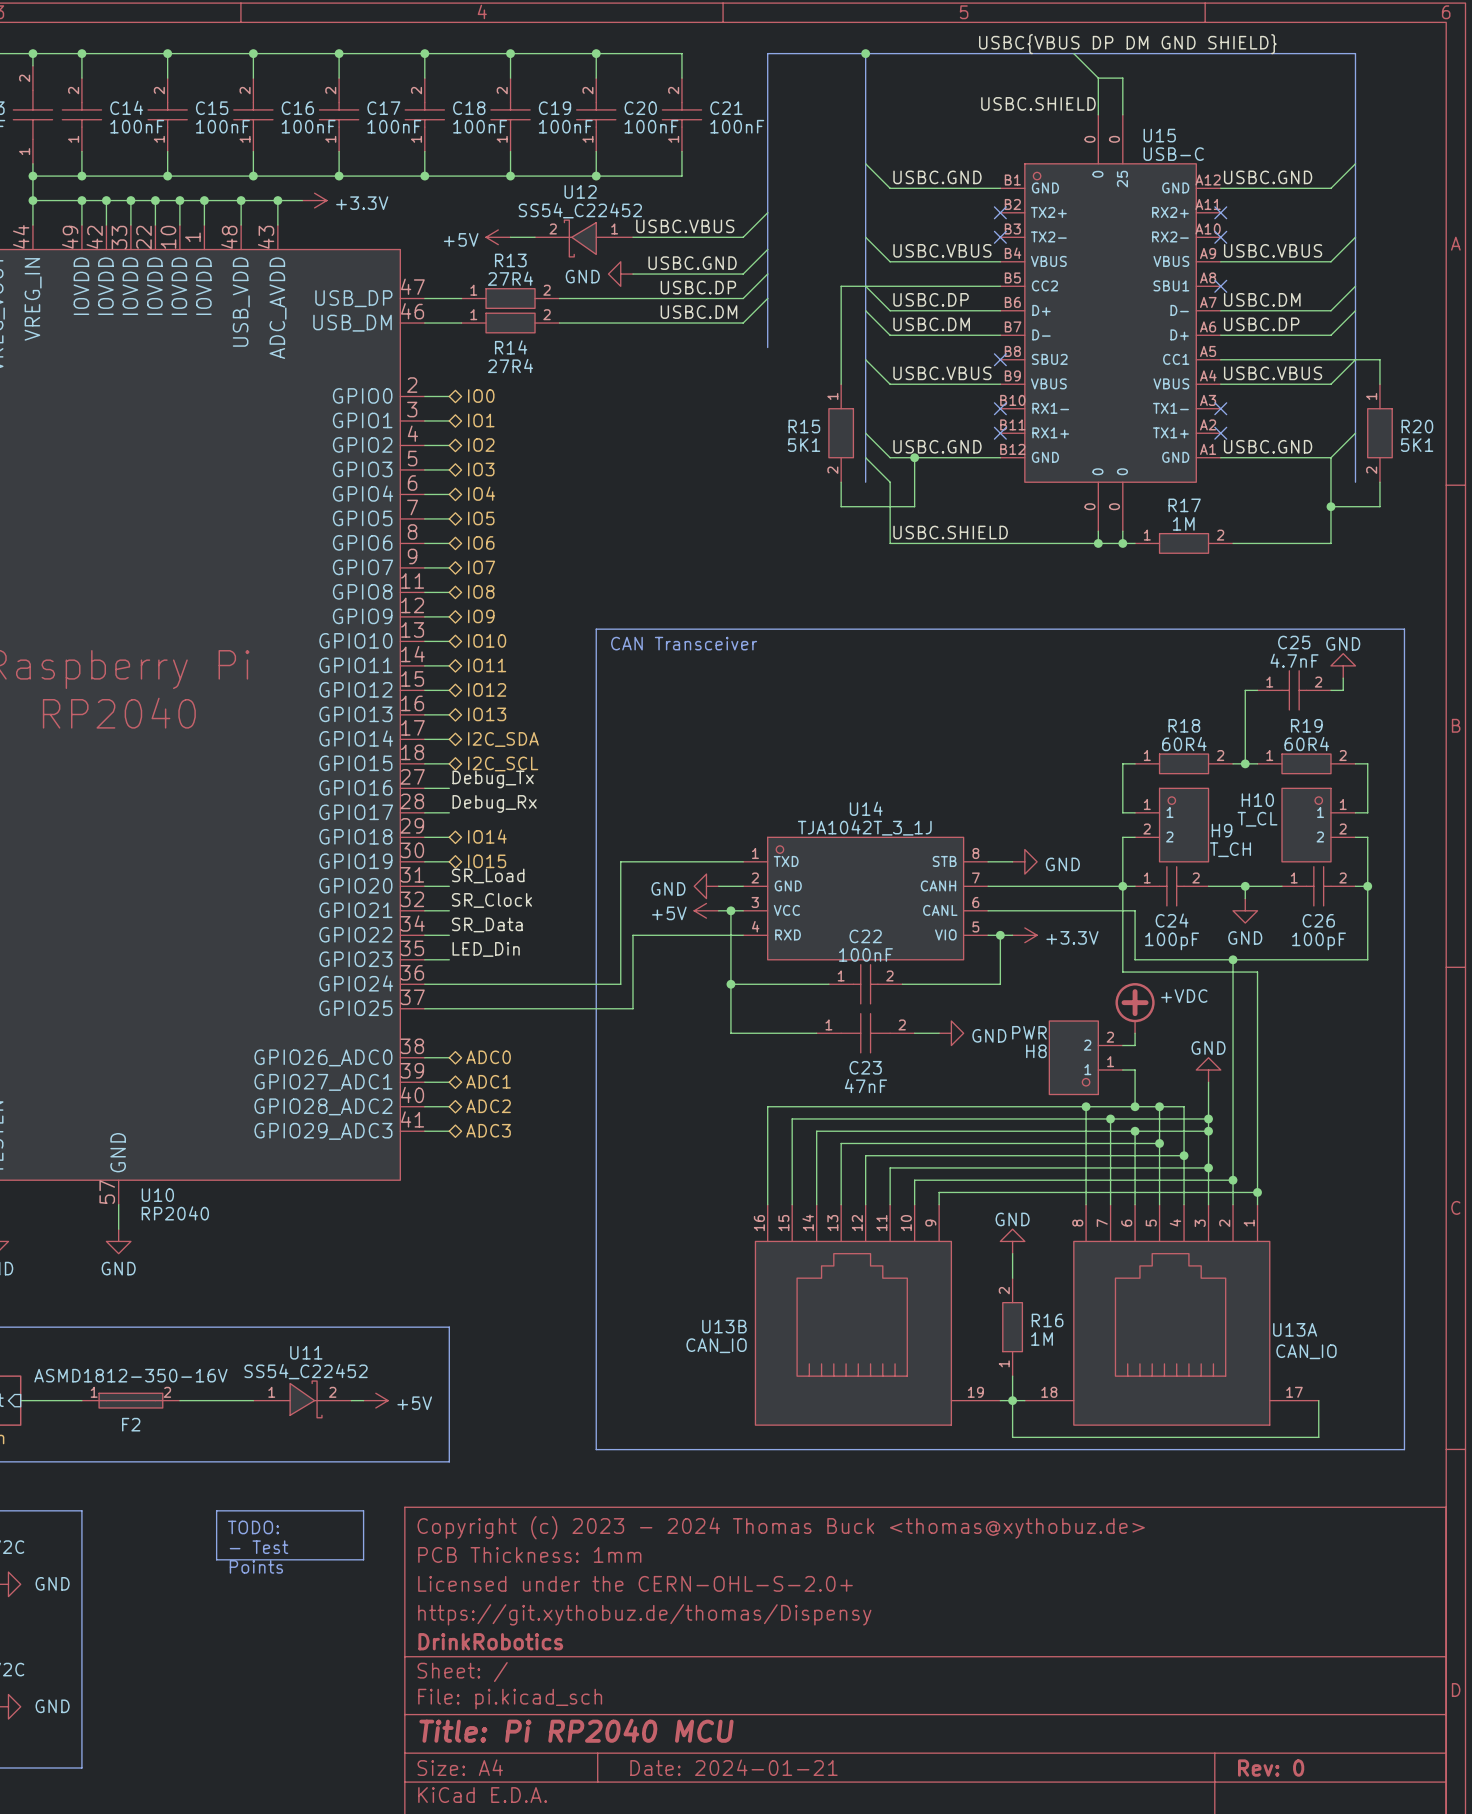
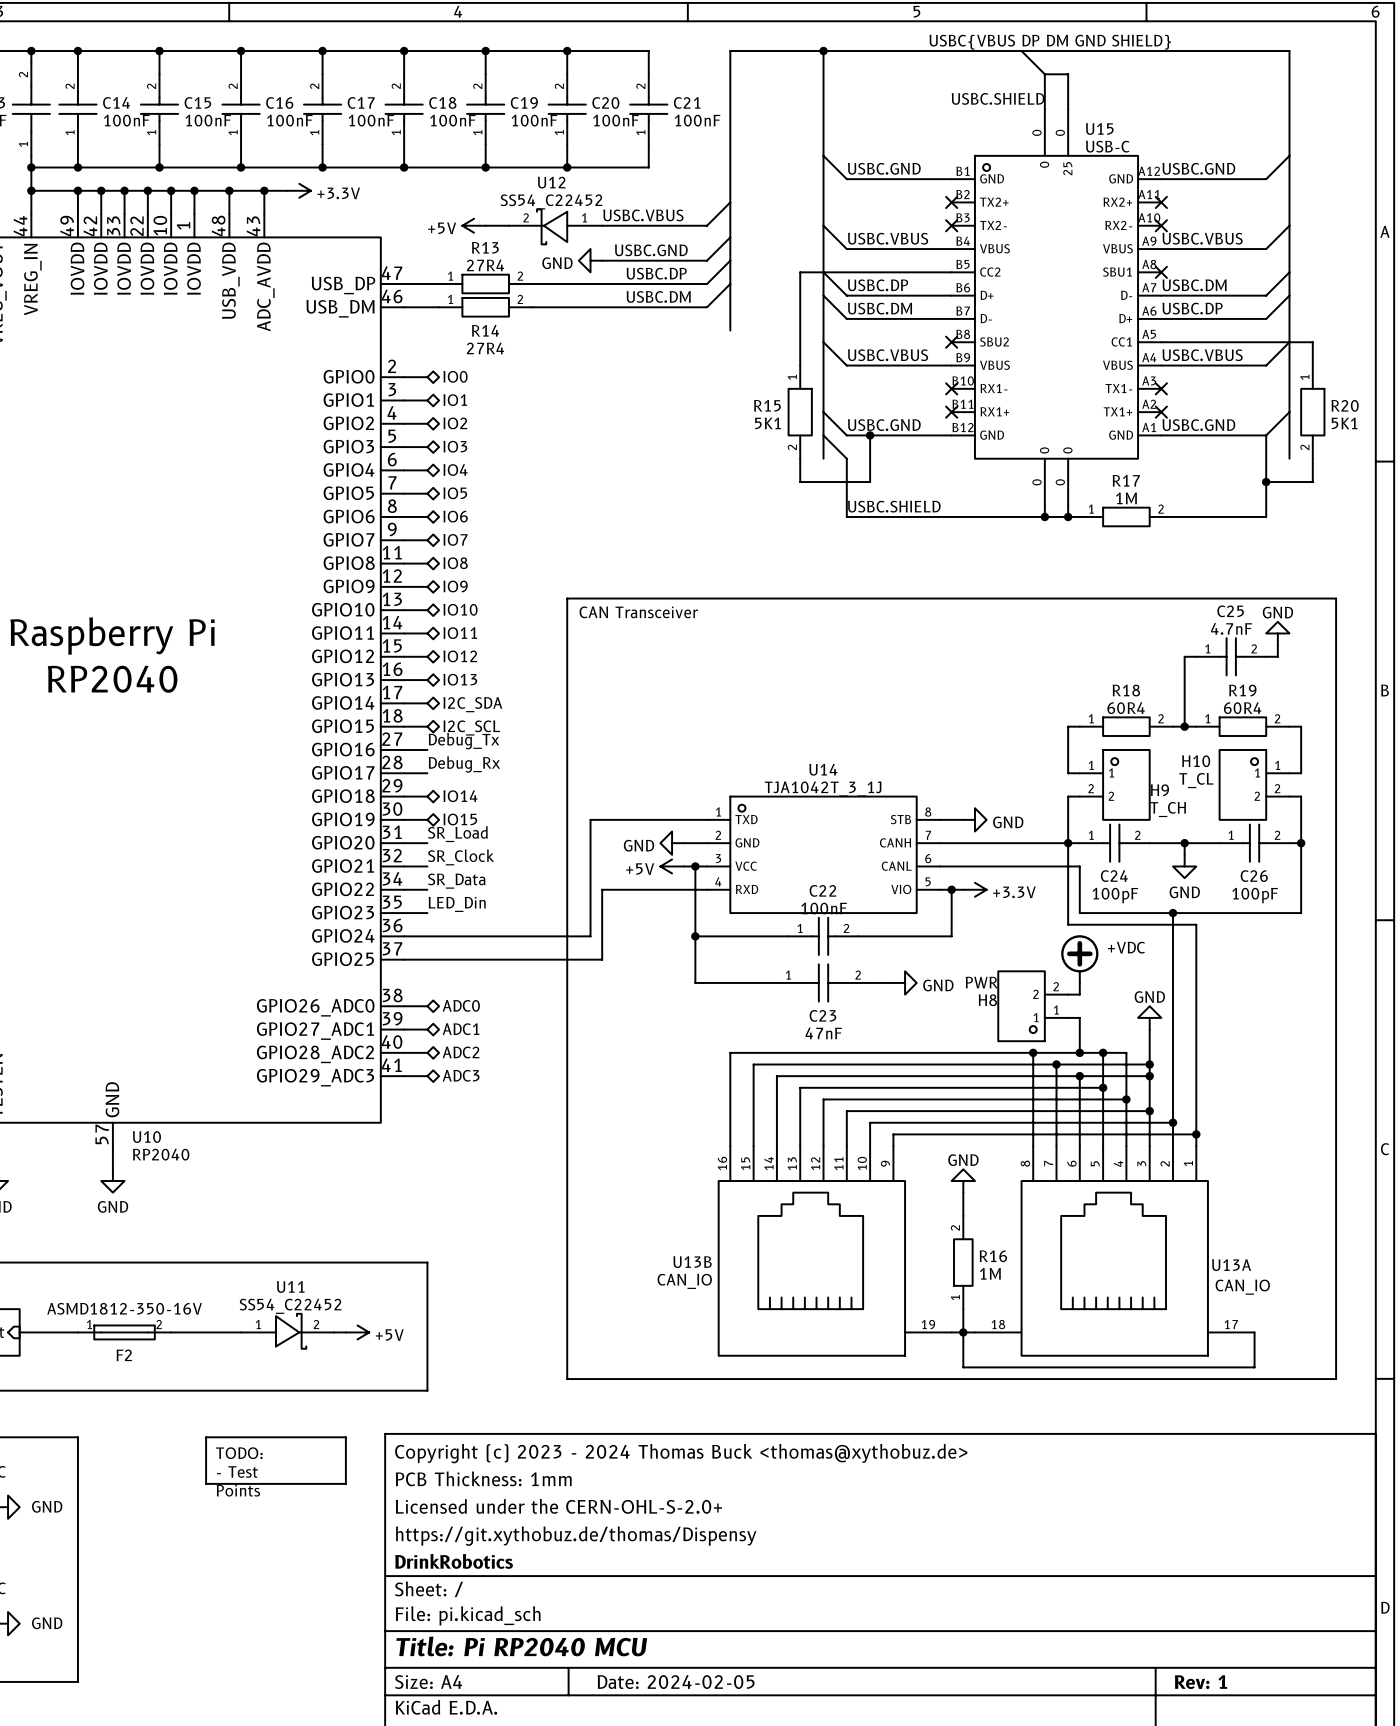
title block: Date: 2024-01-21 (734, 1767) -> Date: 2024-02-05 (676, 1682)
title block: Rev: 0 (1271, 1768) -> Rev: 1 (1200, 1682)

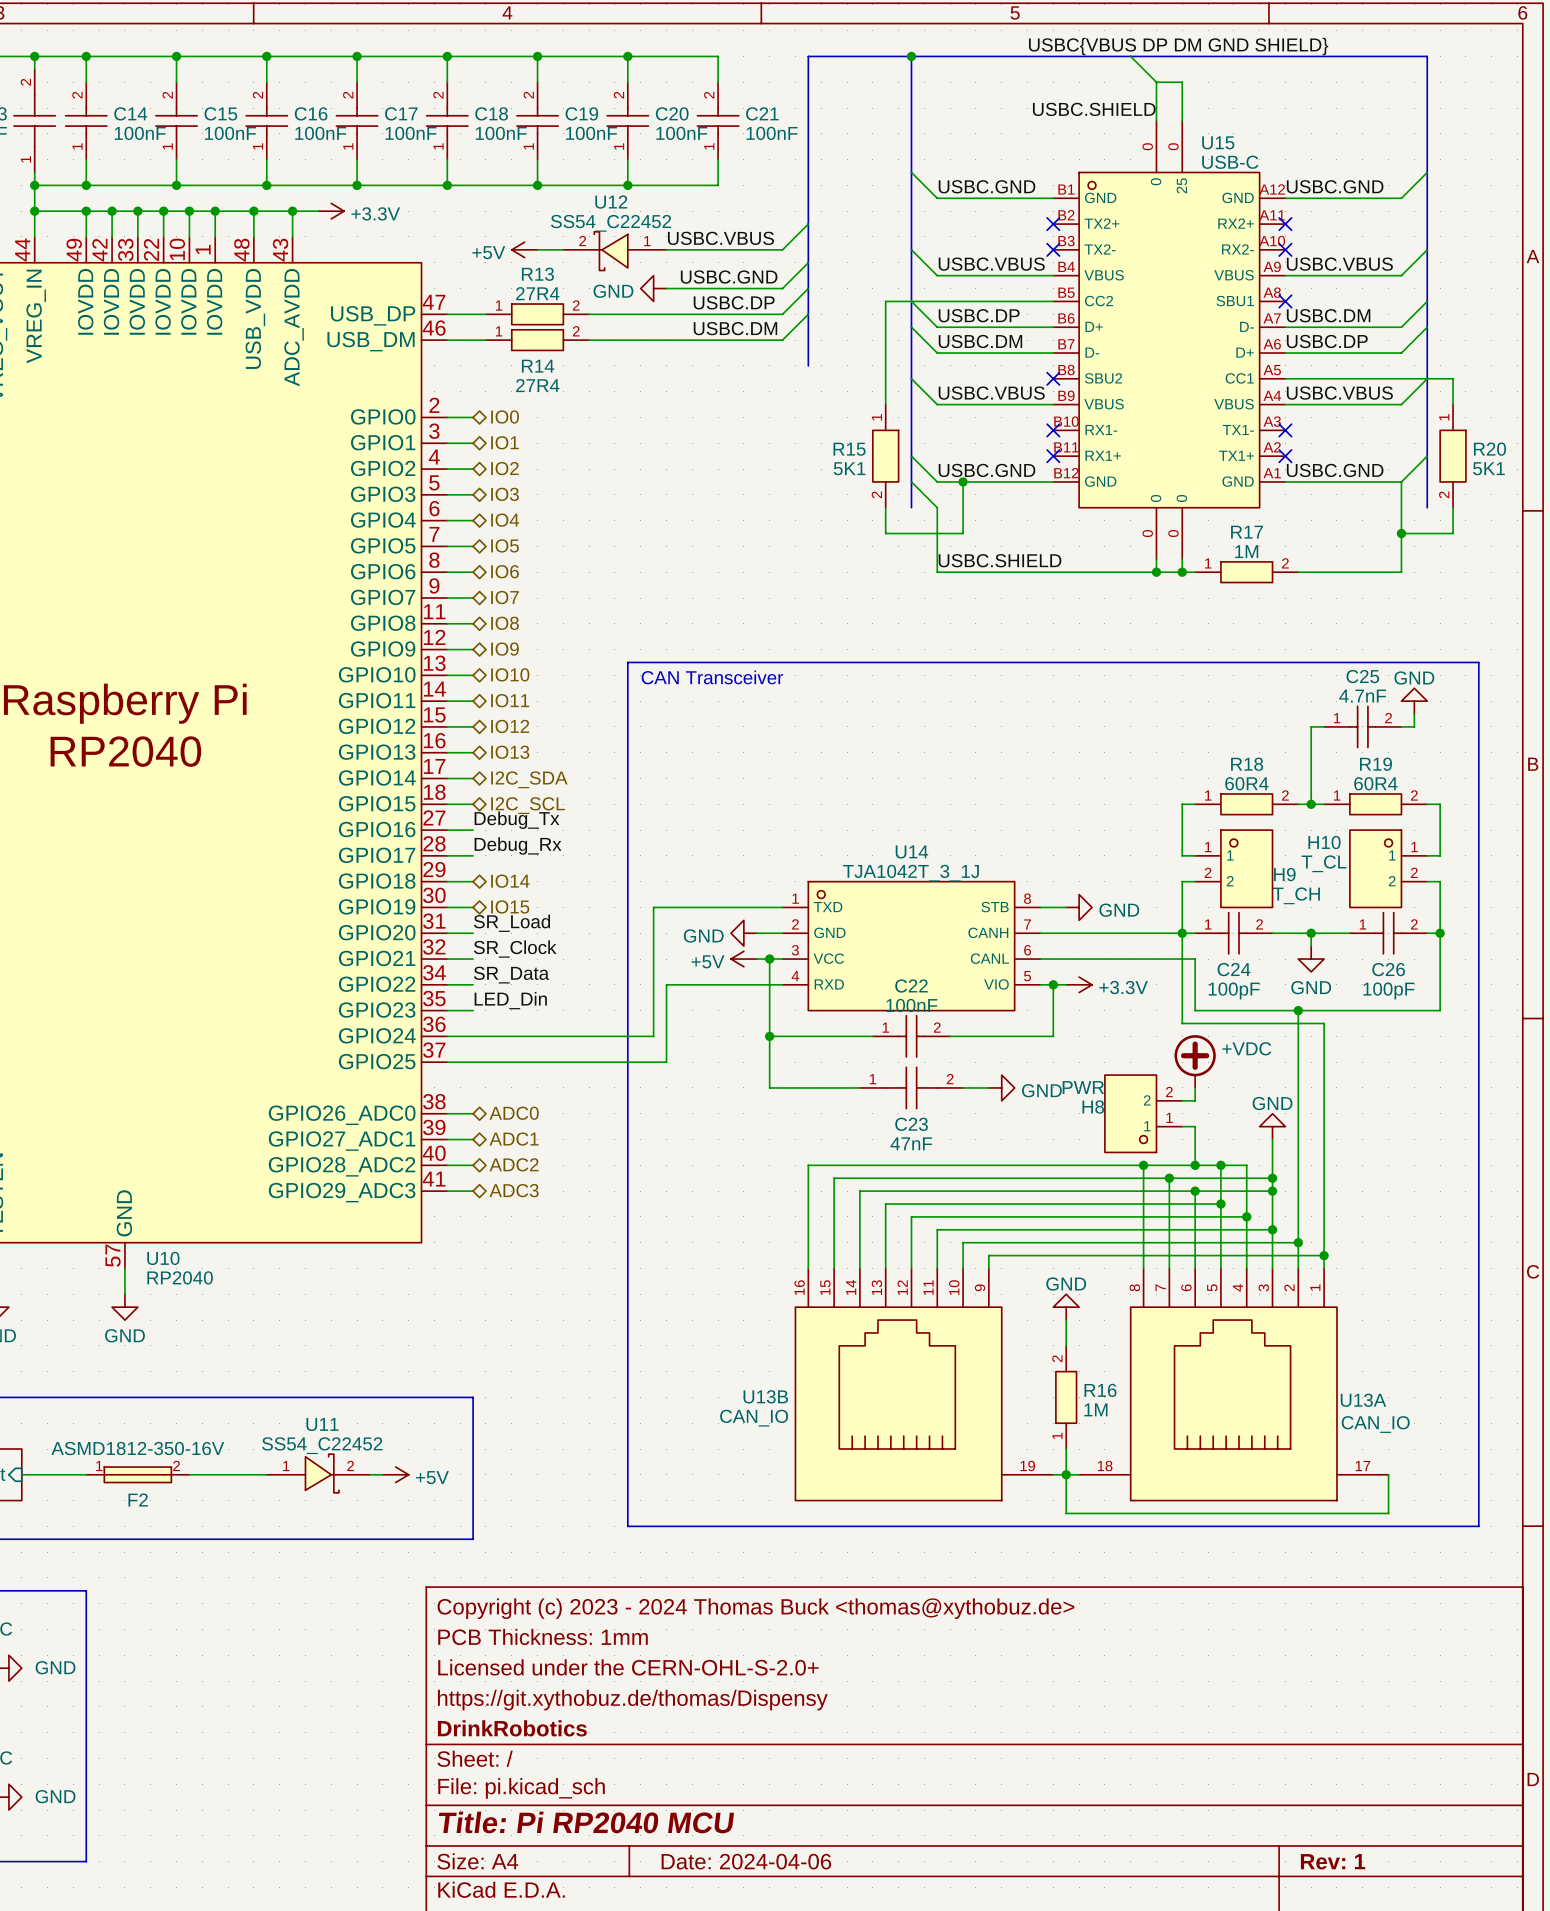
line: (206, 1437) (345, 1437) (345, 1483) (206, 1483) (206, 1437) -> none
text: TODO: (239, 1453) -> none
text: - Test (237, 1472) -> none
text: Points (238, 1490) -> none
title block: Date: 2024-02-05 (676, 1682) -> Date: 2024-04-06 (746, 1861)

